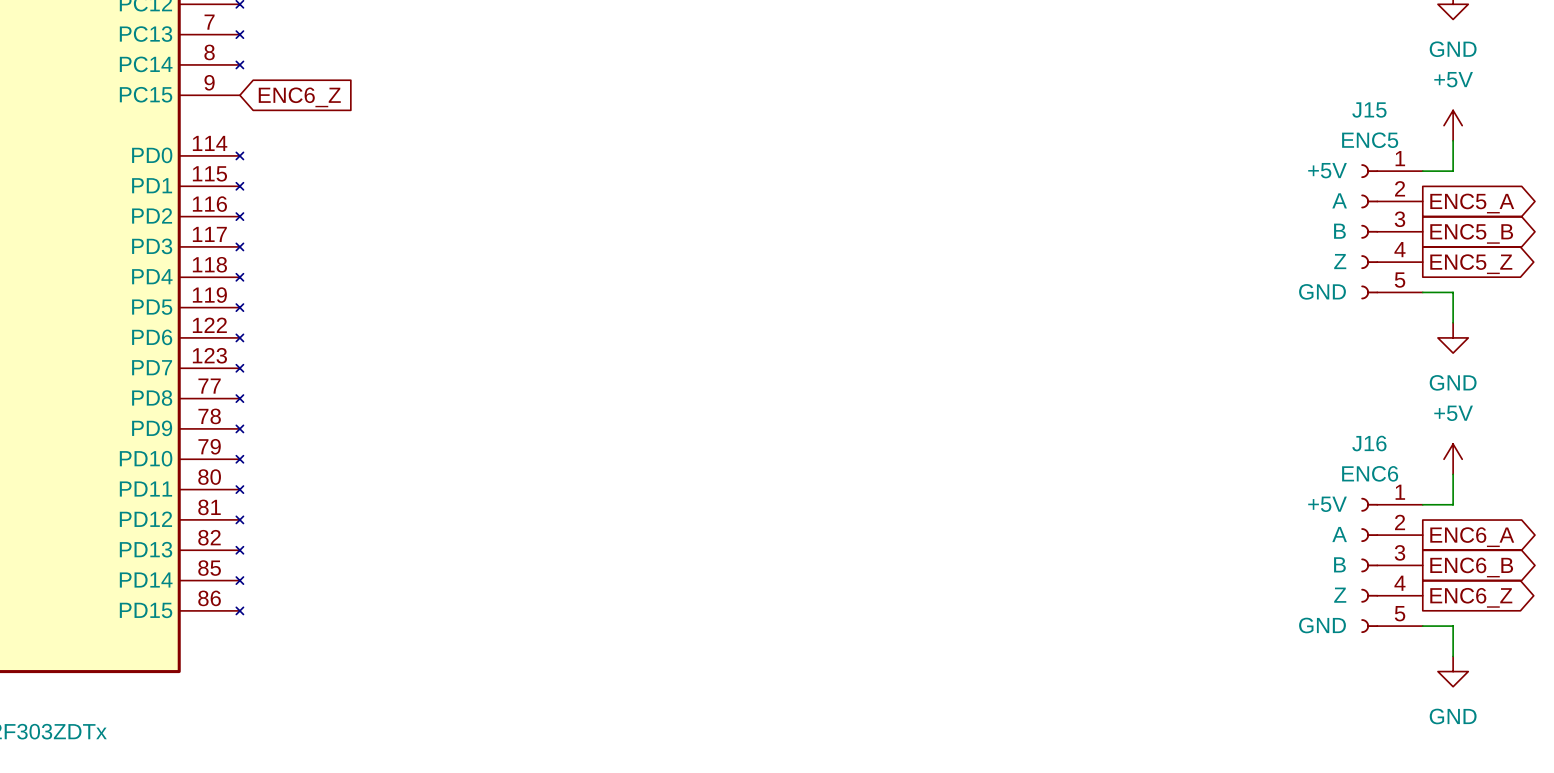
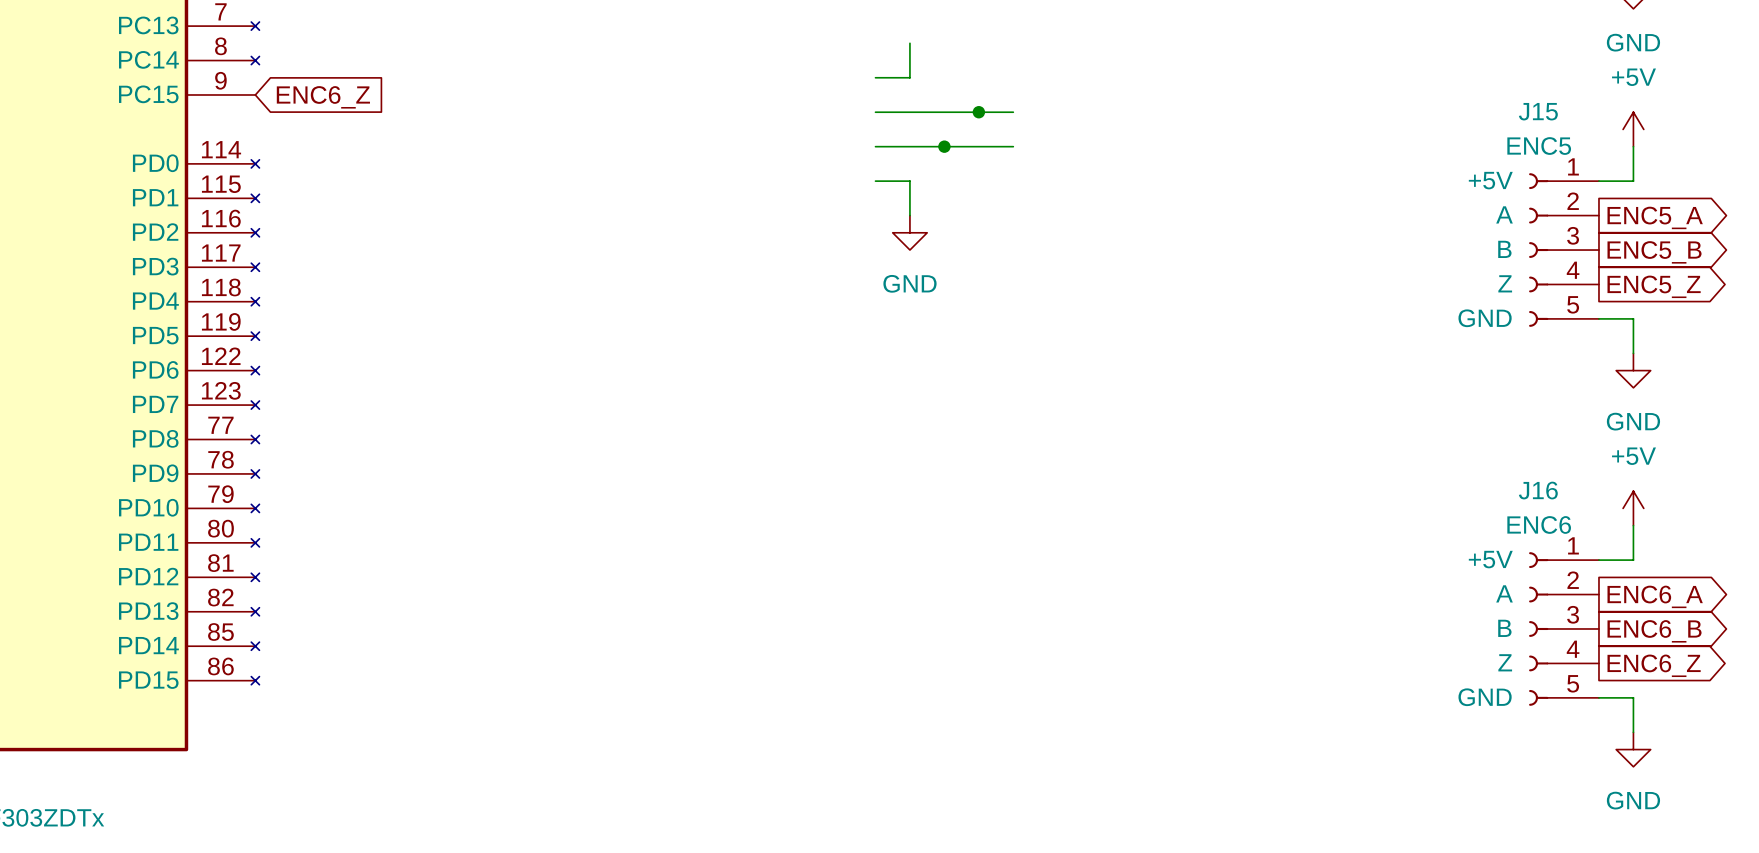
wire: none -> (909, 43) (909, 77) (875, 77)
wire: none -> (875, 112) (1013, 112)
junction: none -> (978, 112)
wire: none -> (875, 146) (1013, 146)
junction: none -> (944, 146)
wire: none -> (875, 181) (909, 181) (909, 215)
power symbol: none -> GND (909, 232)

